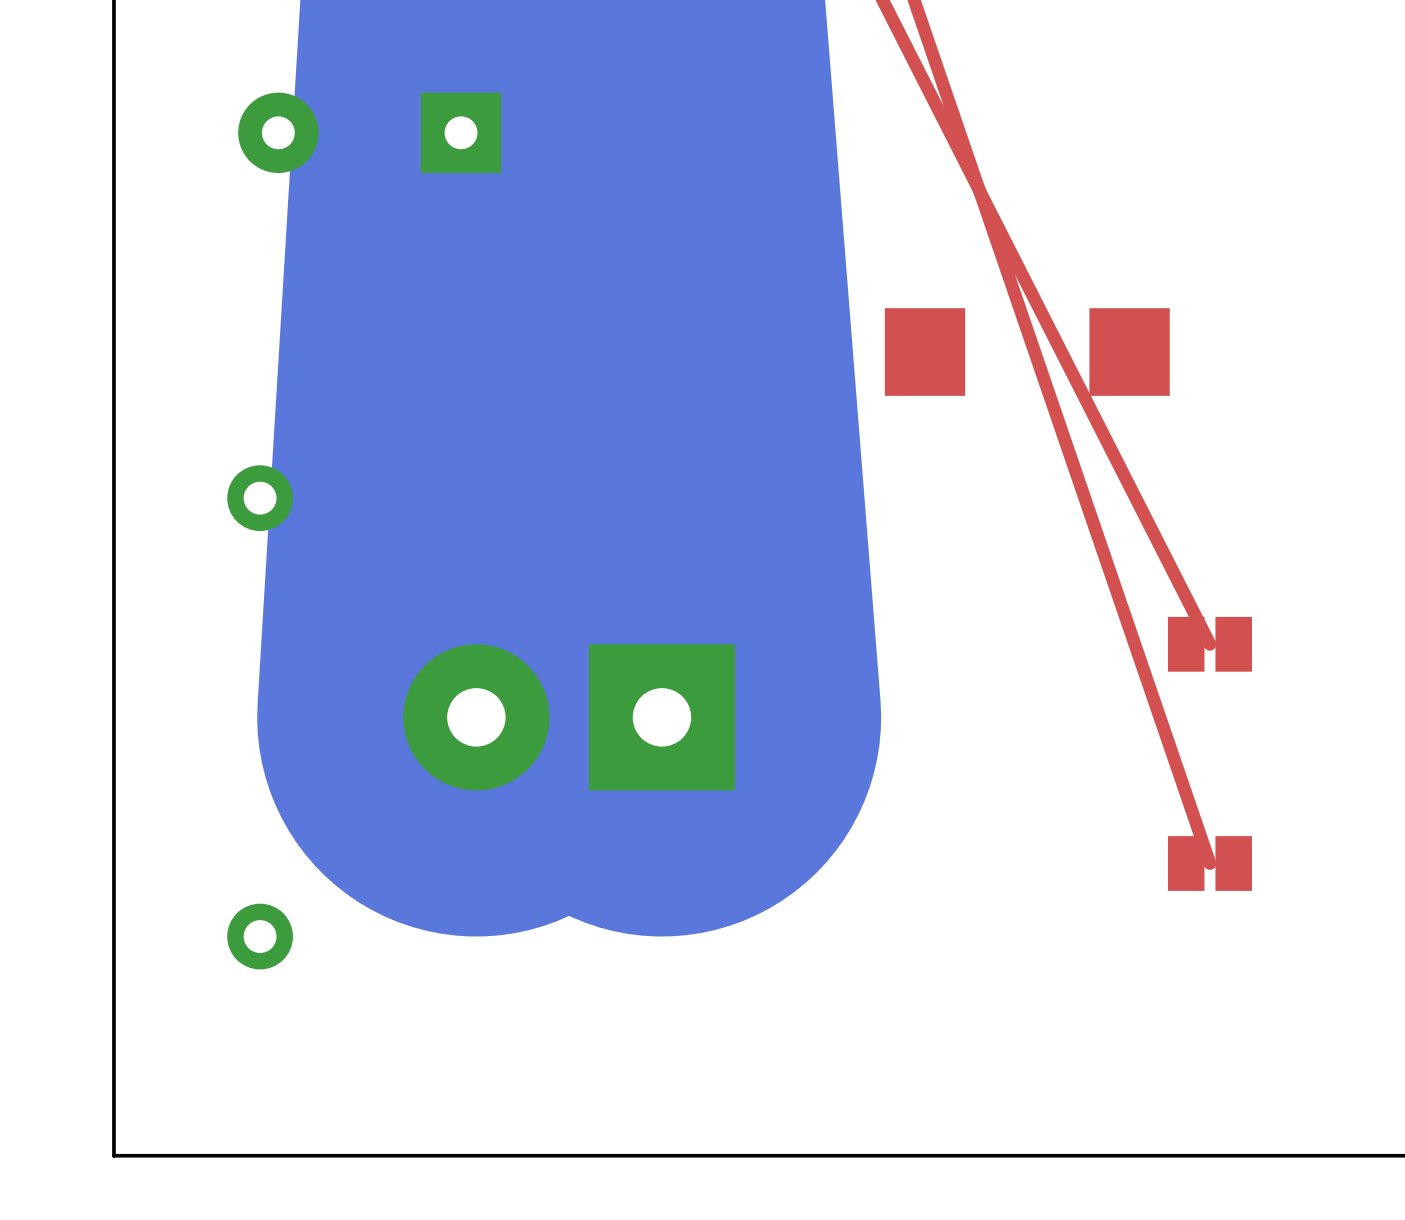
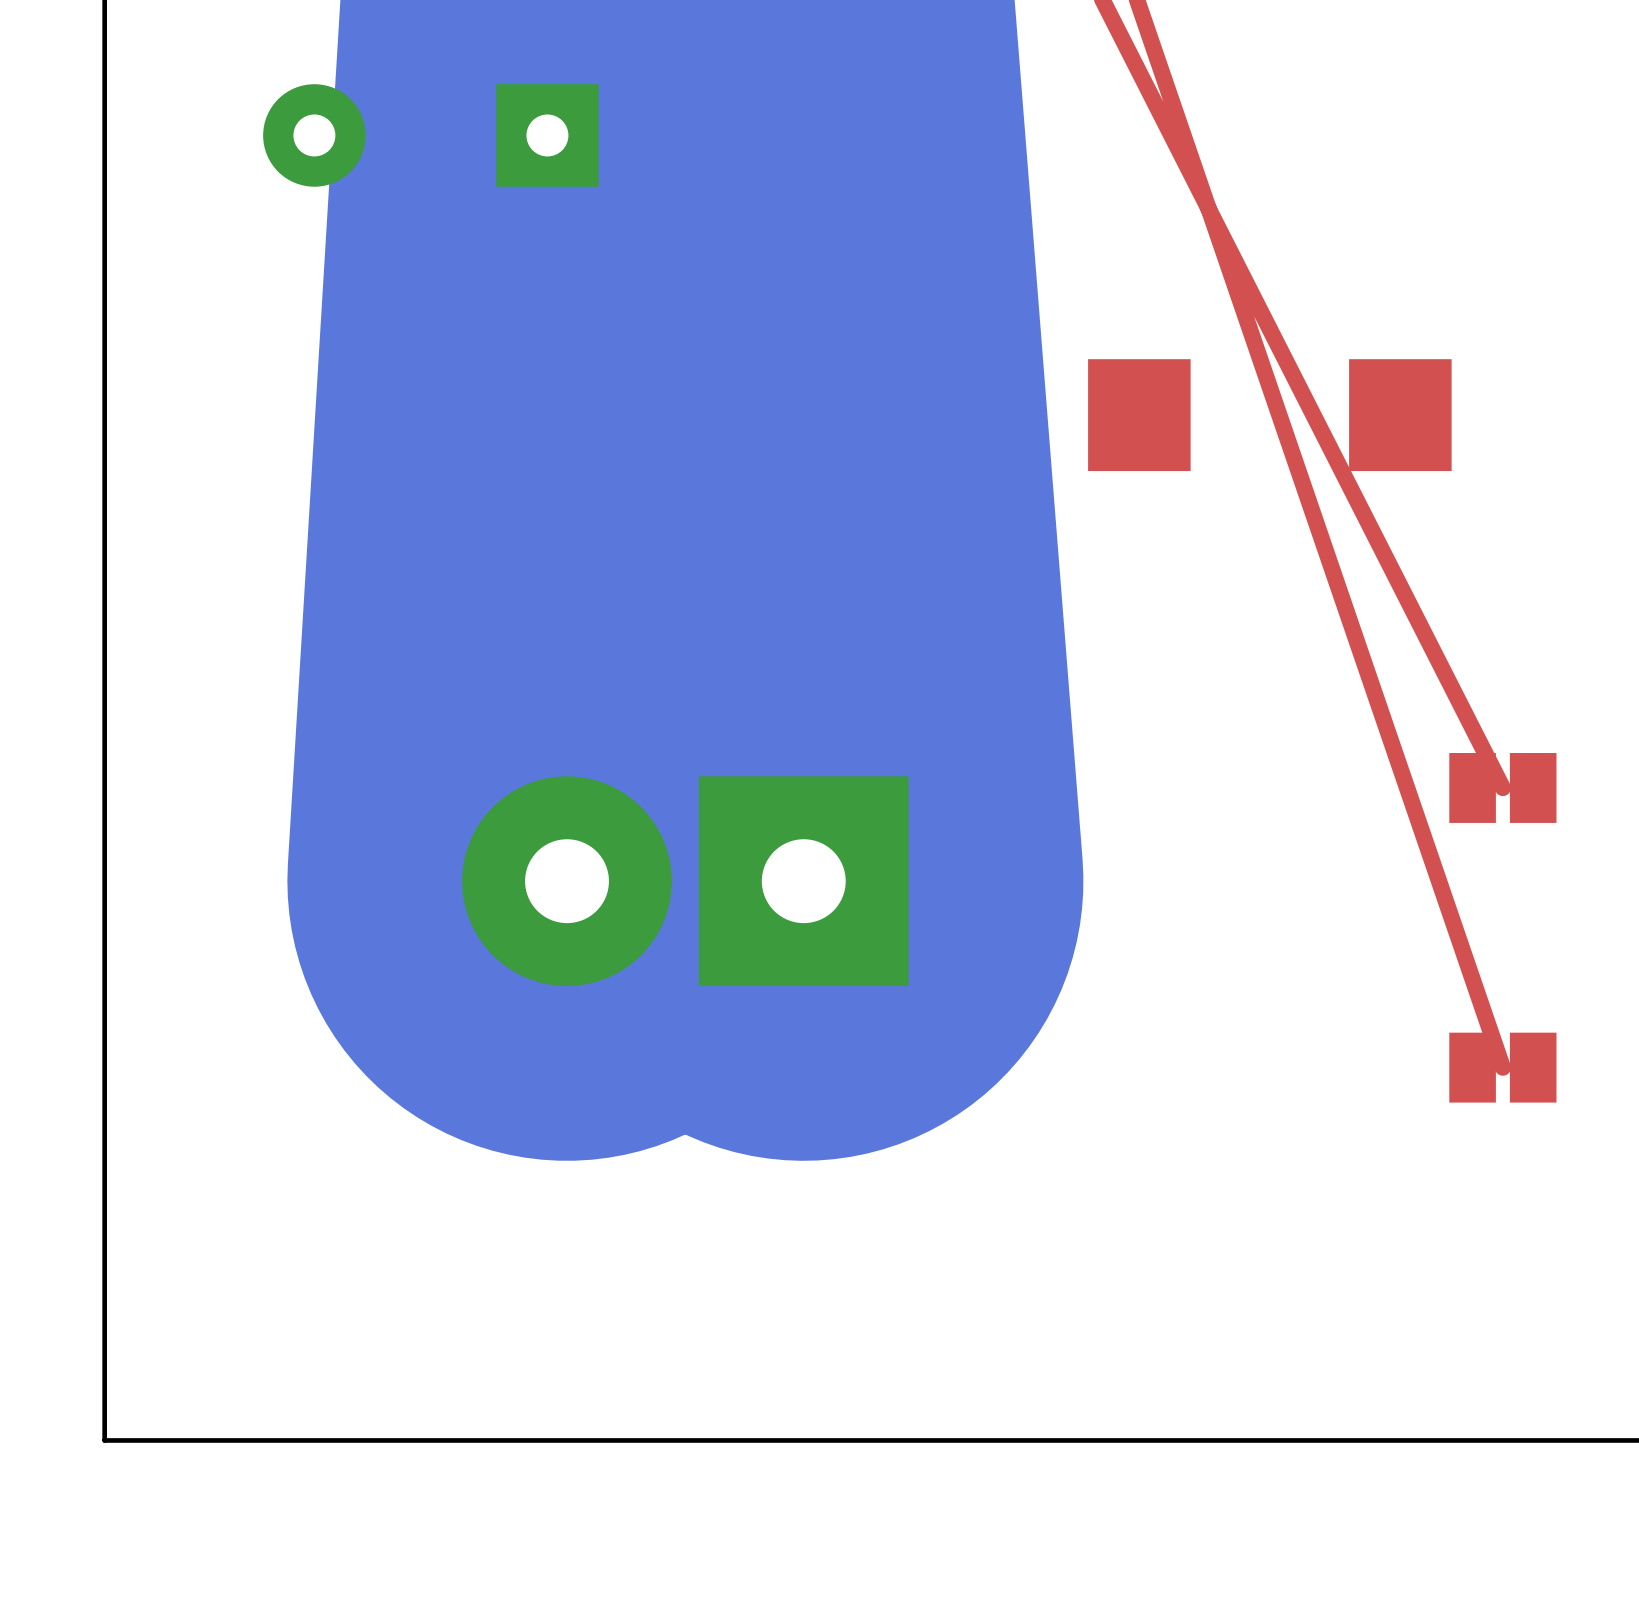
part: (260, 498) -> none
part footprint: [403, 644, 736, 791] -> [462, 776, 909, 987]
part: (260, 936) -> none

